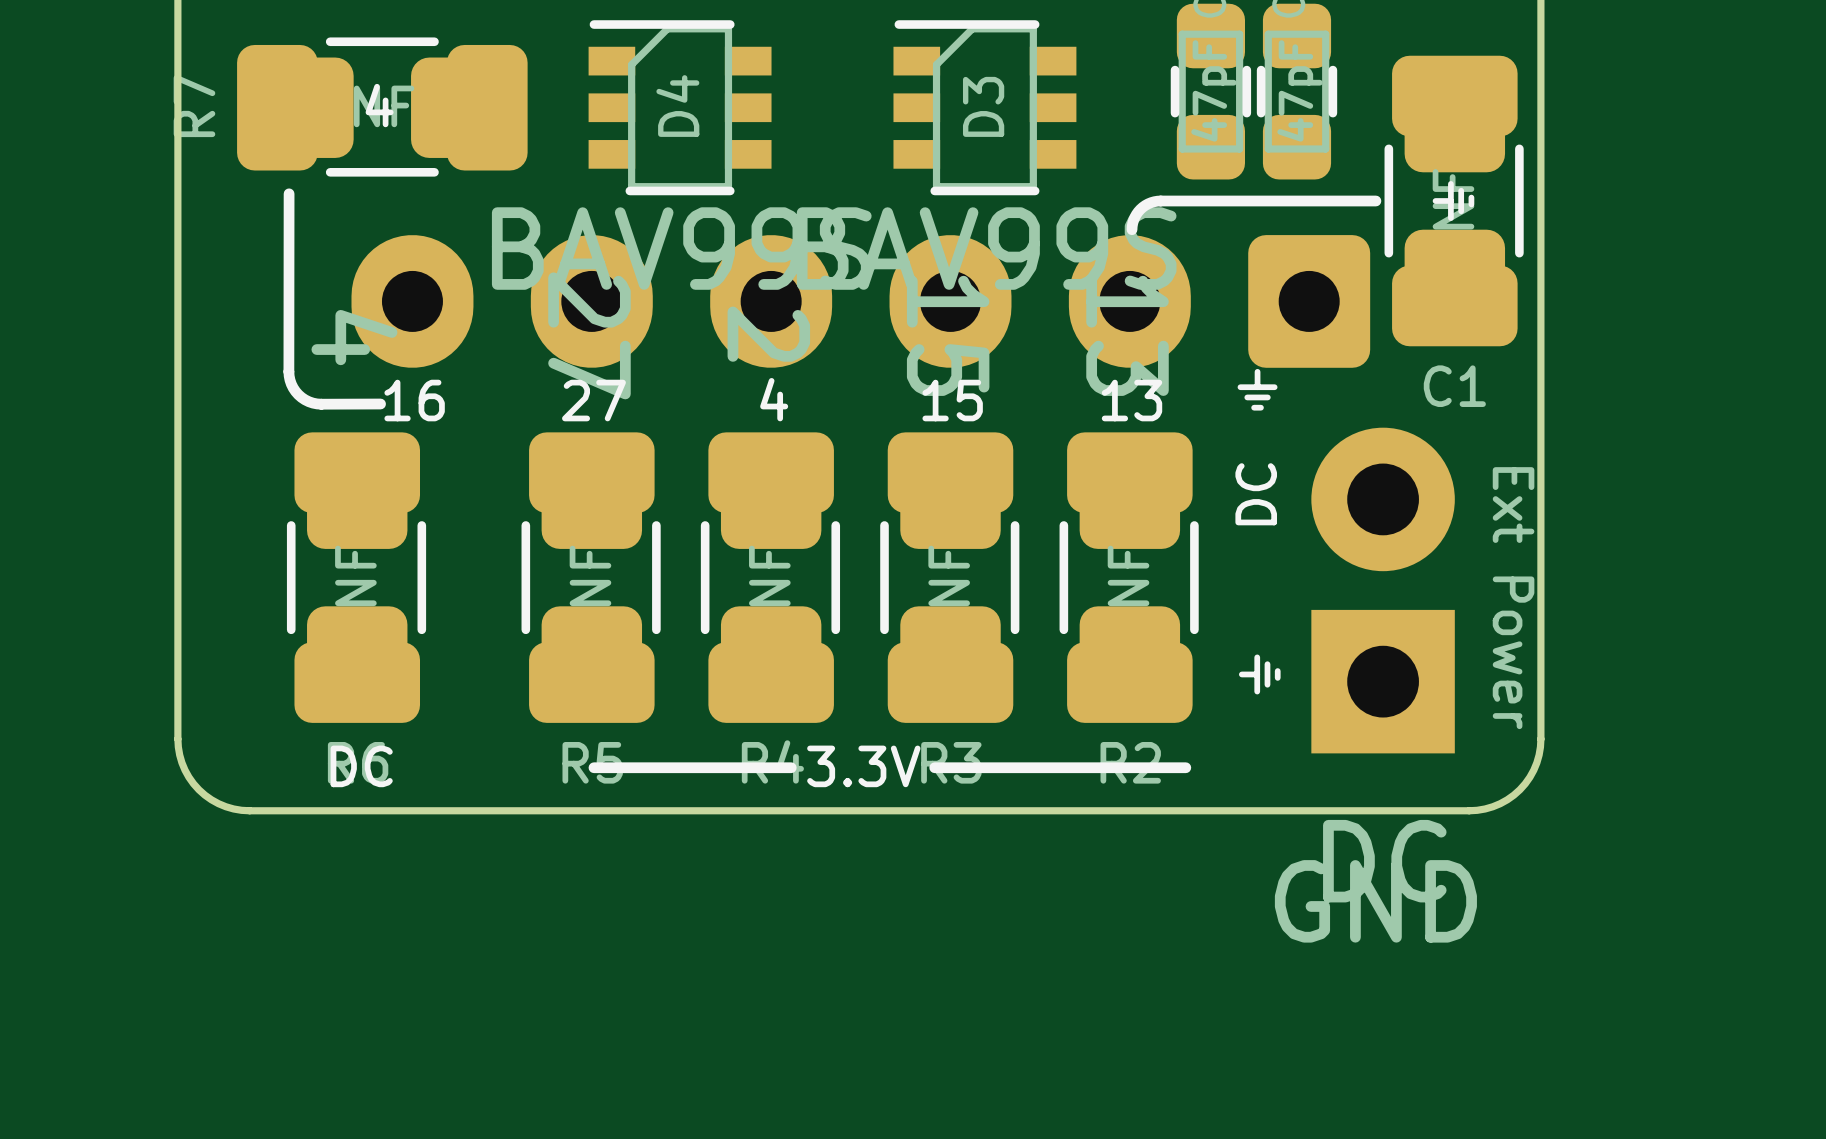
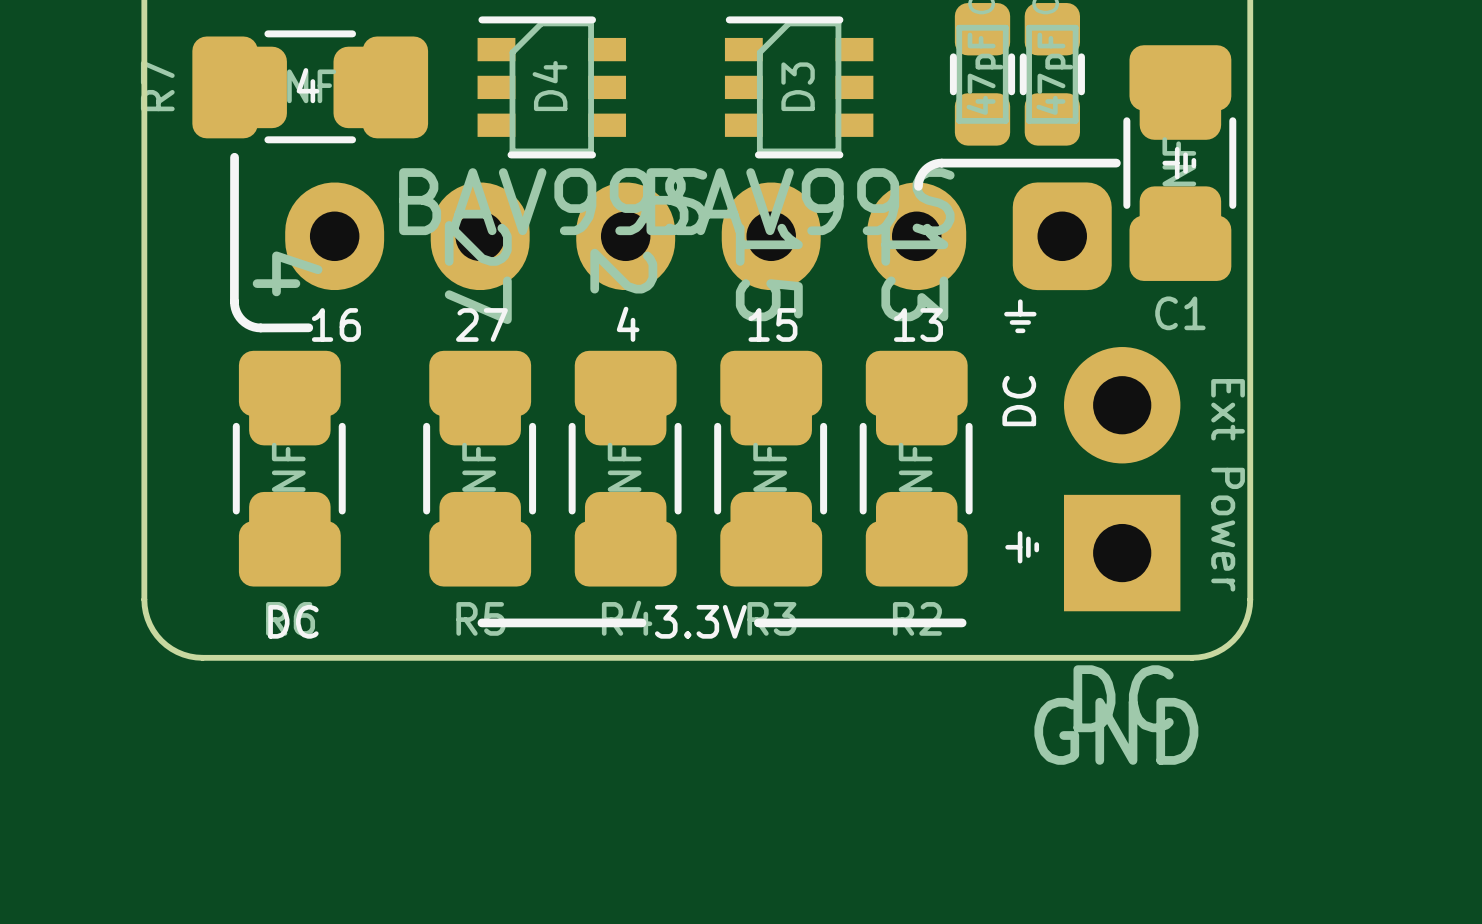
part footprint: [351, 235, 1371, 368] -> [285, 182, 1112, 291]

